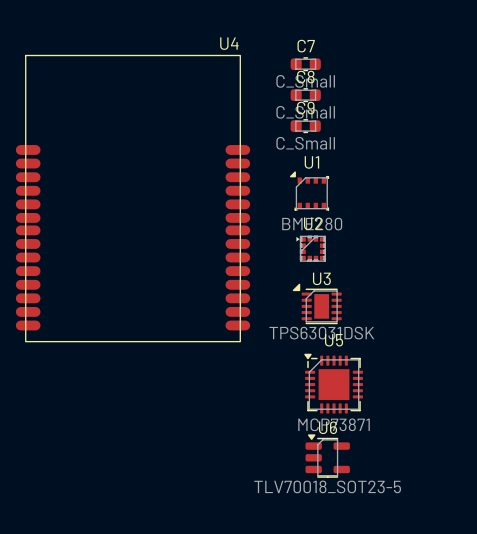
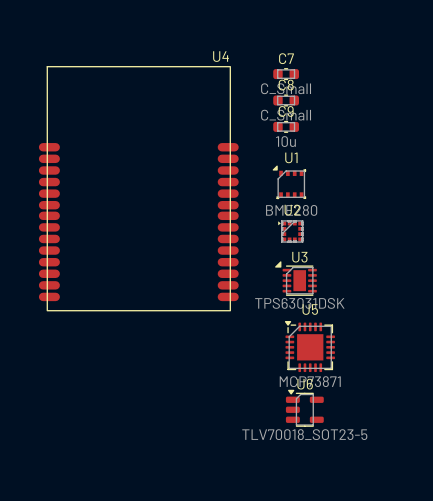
C9 value: C_Small (305, 143) -> 10u (285, 141)

